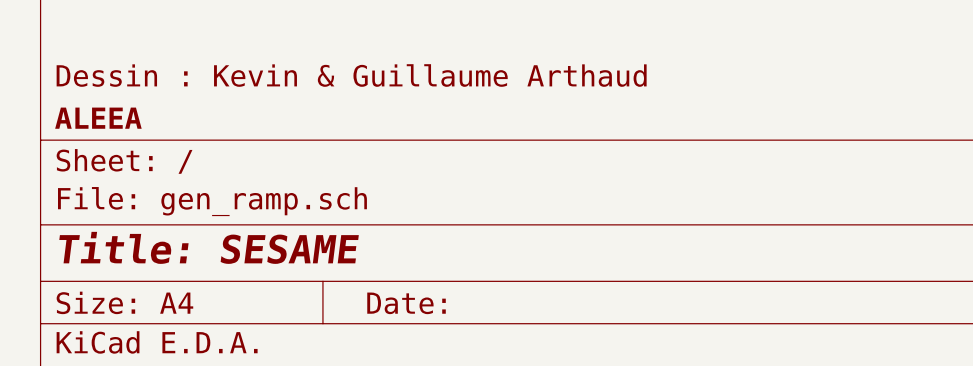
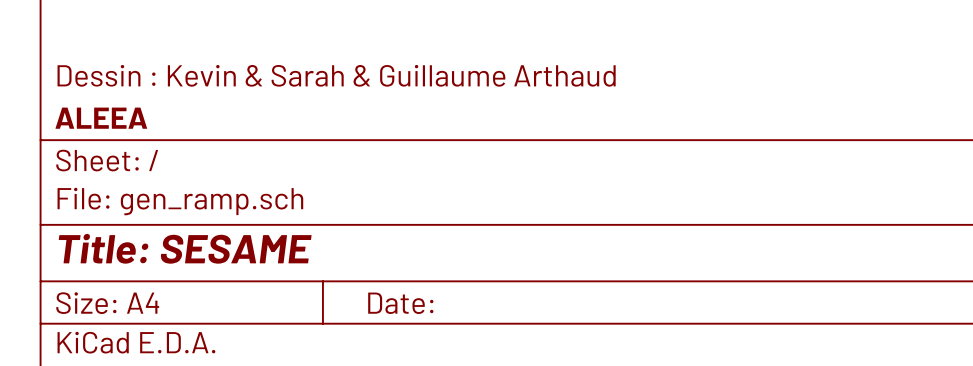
title block: Dessin : Kevin & Guillaume Arthaud (351, 75) -> Dessin : Kevin & Sarah & Guillaume Arthaud (336, 75)

